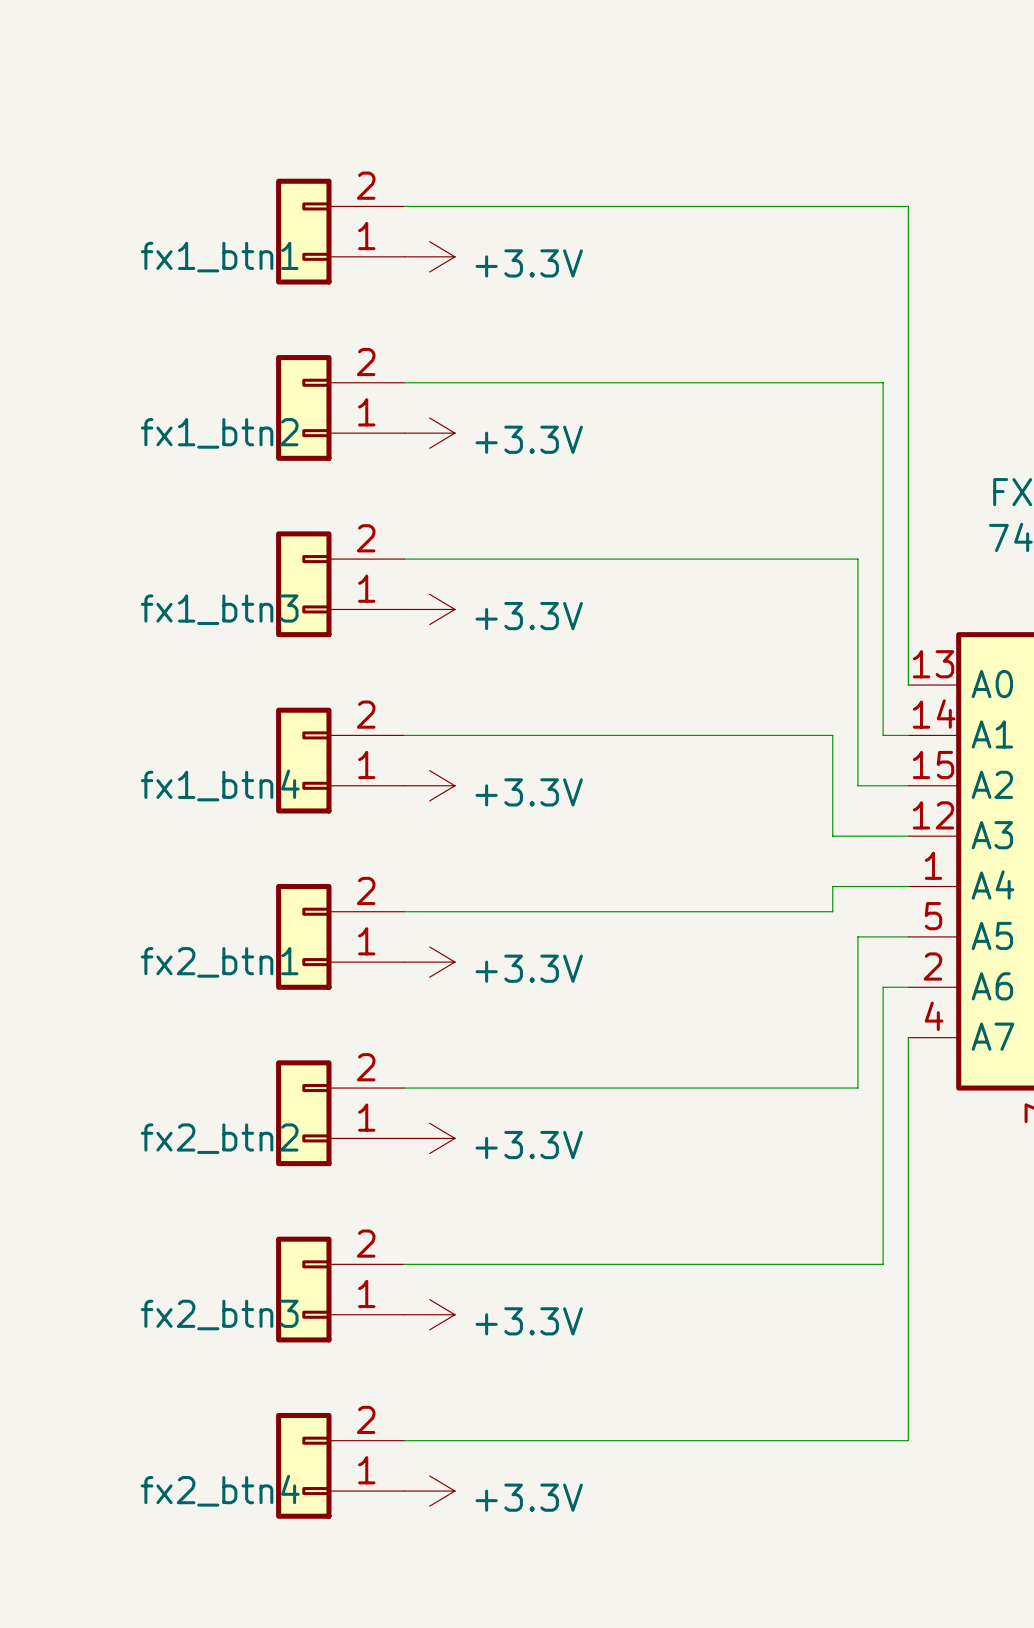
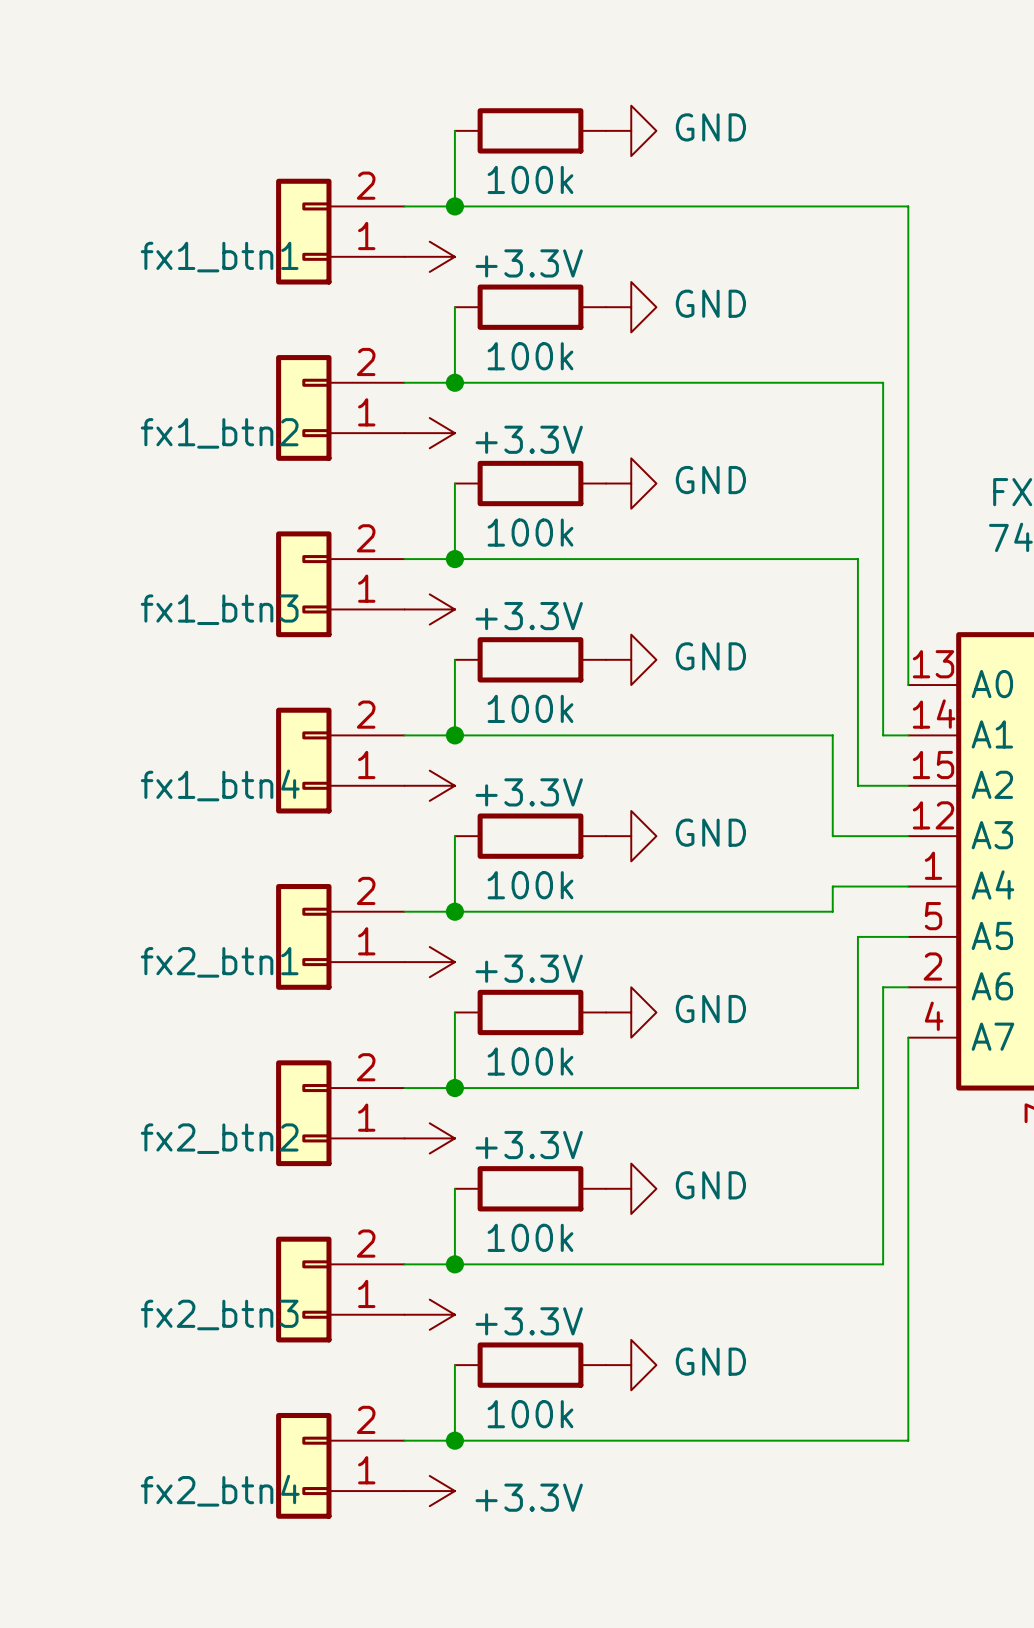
wire: none -> (454, 130) (454, 206)
part: none -> 100k (530, 130)
power symbol: none -> GND (631, 130)
junction: none -> (454, 206)
wire: none -> (454, 307) (454, 382)
part: none -> 100k (530, 307)
power symbol: none -> GND (631, 307)
junction: none -> (454, 382)
wire: none -> (454, 483) (454, 559)
part: none -> 100k (530, 483)
power symbol: none -> GND (631, 483)
junction: none -> (454, 559)
wire: none -> (454, 659) (454, 735)
part: none -> 100k (530, 659)
power symbol: none -> GND (631, 659)
junction: none -> (454, 735)
wire: none -> (454, 836) (454, 911)
part: none -> 100k (530, 836)
power symbol: none -> GND (631, 836)
junction: none -> (454, 911)
wire: none -> (454, 1012) (454, 1088)
part: none -> 100k (530, 1012)
power symbol: none -> GND (631, 1012)
junction: none -> (454, 1088)
wire: none -> (454, 1188) (454, 1264)
part: none -> 100k (530, 1188)
power symbol: none -> GND (631, 1188)
junction: none -> (454, 1264)
wire: none -> (454, 1365) (454, 1440)
part: none -> 100k (530, 1365)
power symbol: none -> GND (631, 1365)
junction: none -> (454, 1440)

